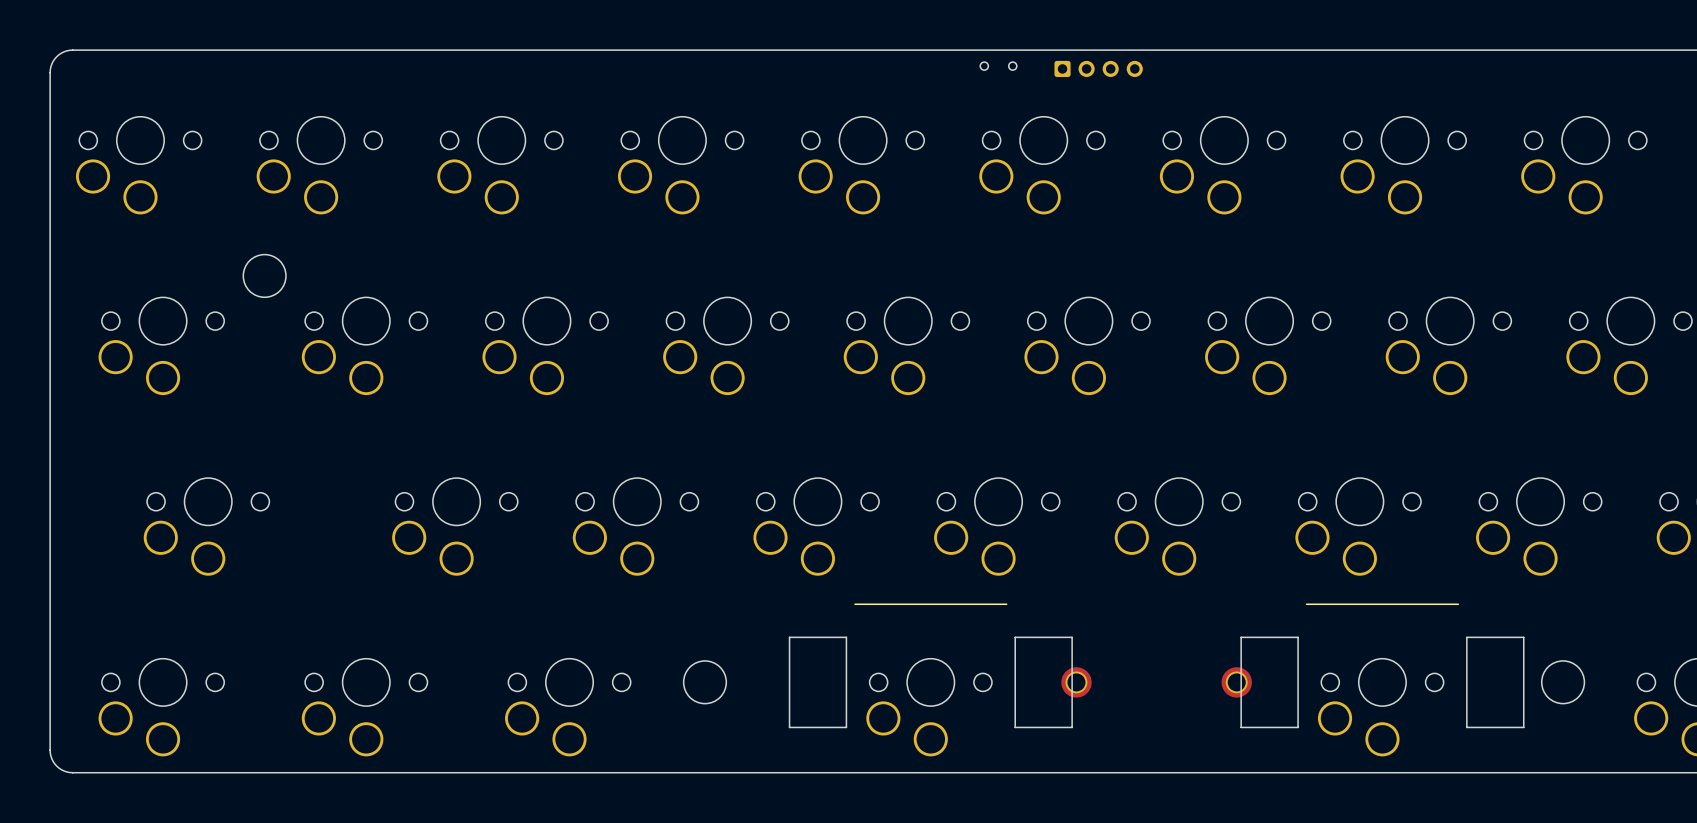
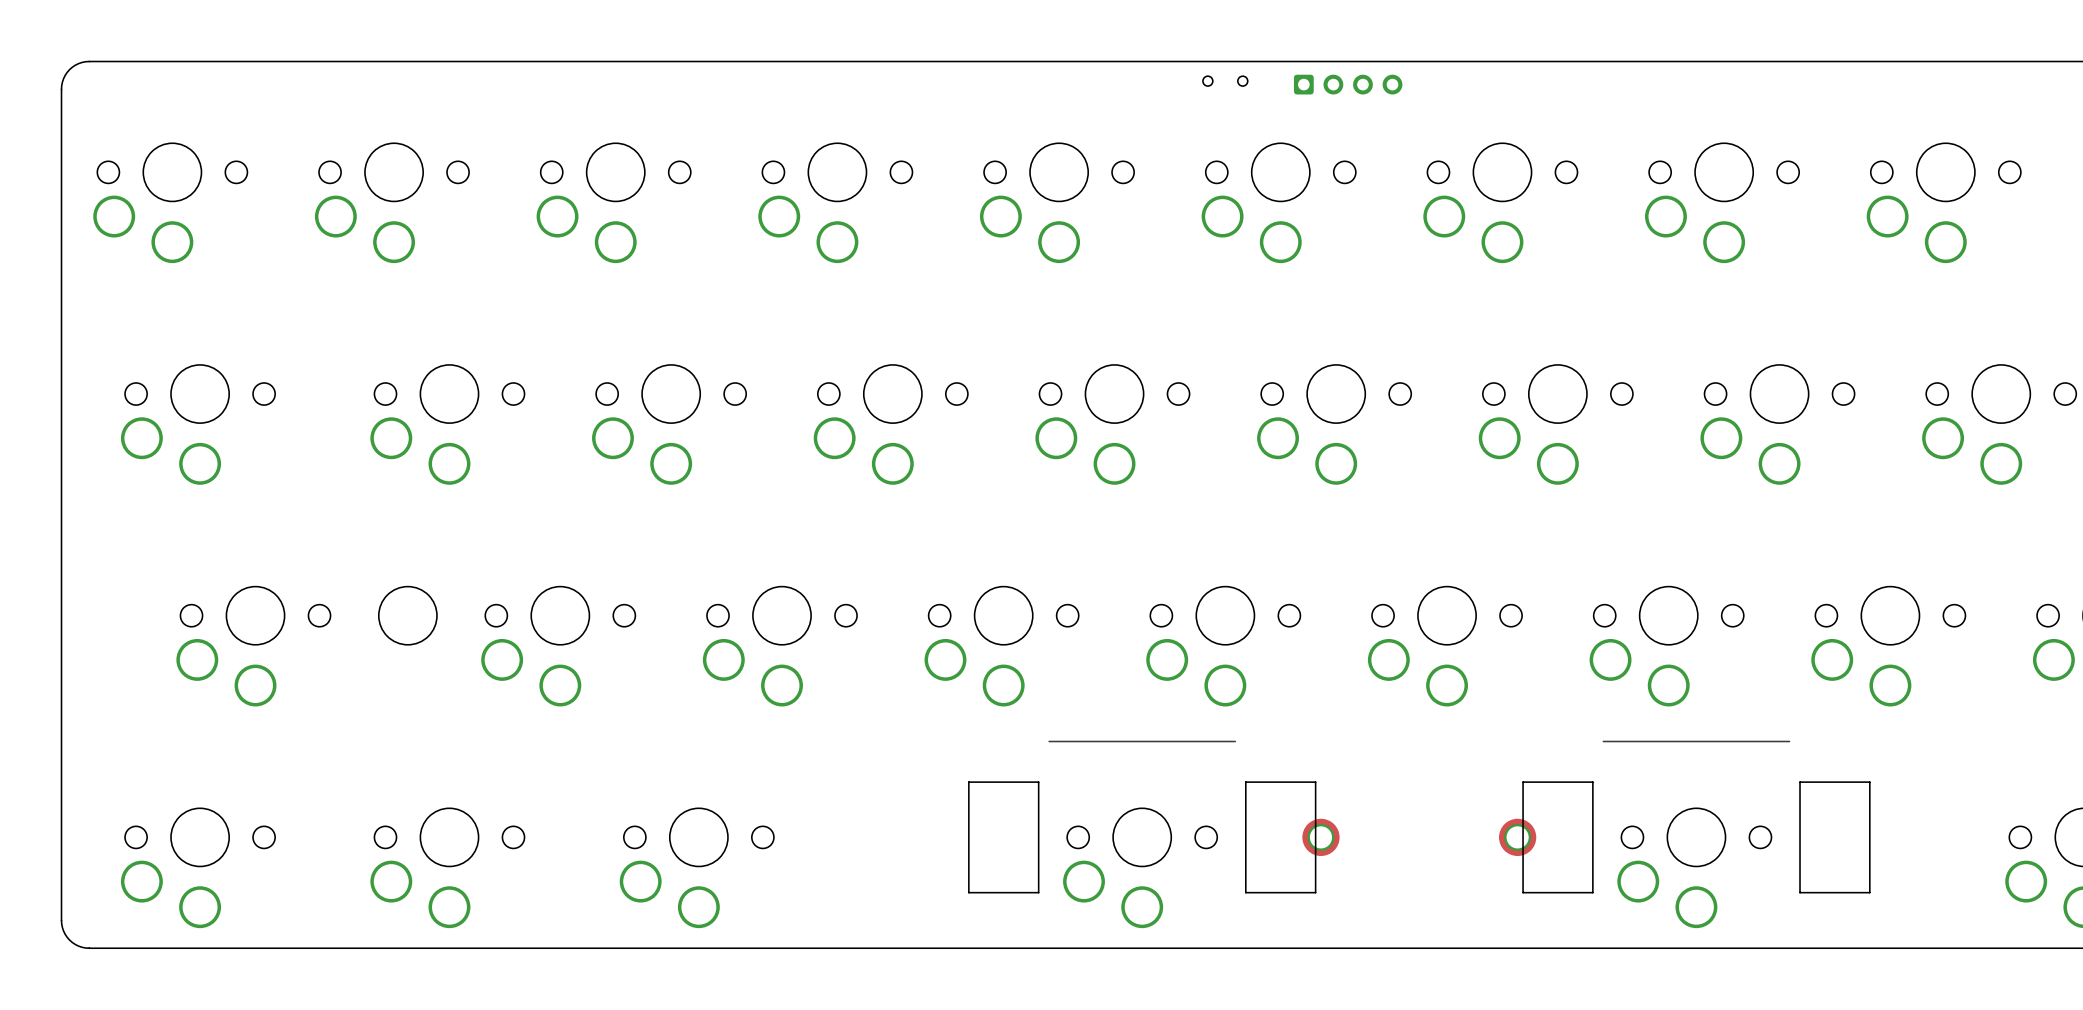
round board edge: [243, 254, 287, 298] -> none
round board edge: none -> [378, 586, 438, 646]
round board edge: [683, 660, 727, 704] -> none
round board edge: [1541, 660, 1585, 704] -> none

